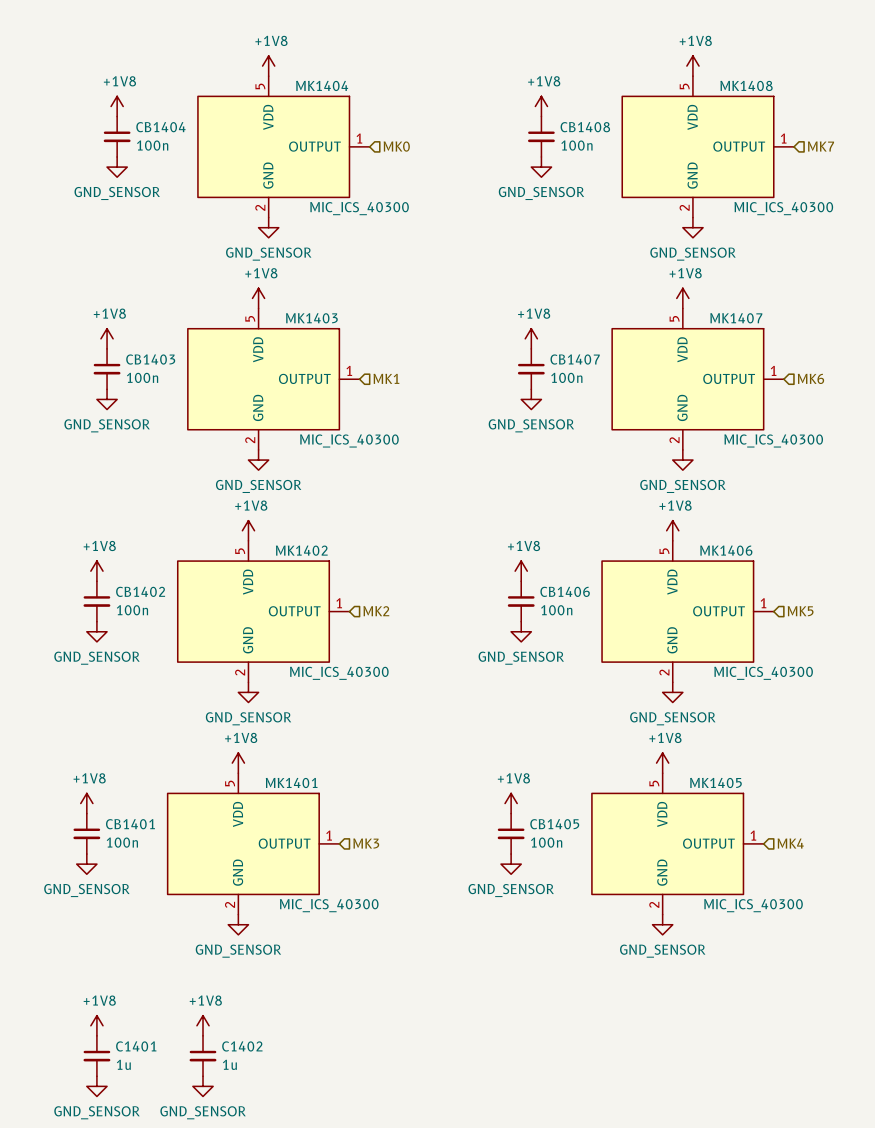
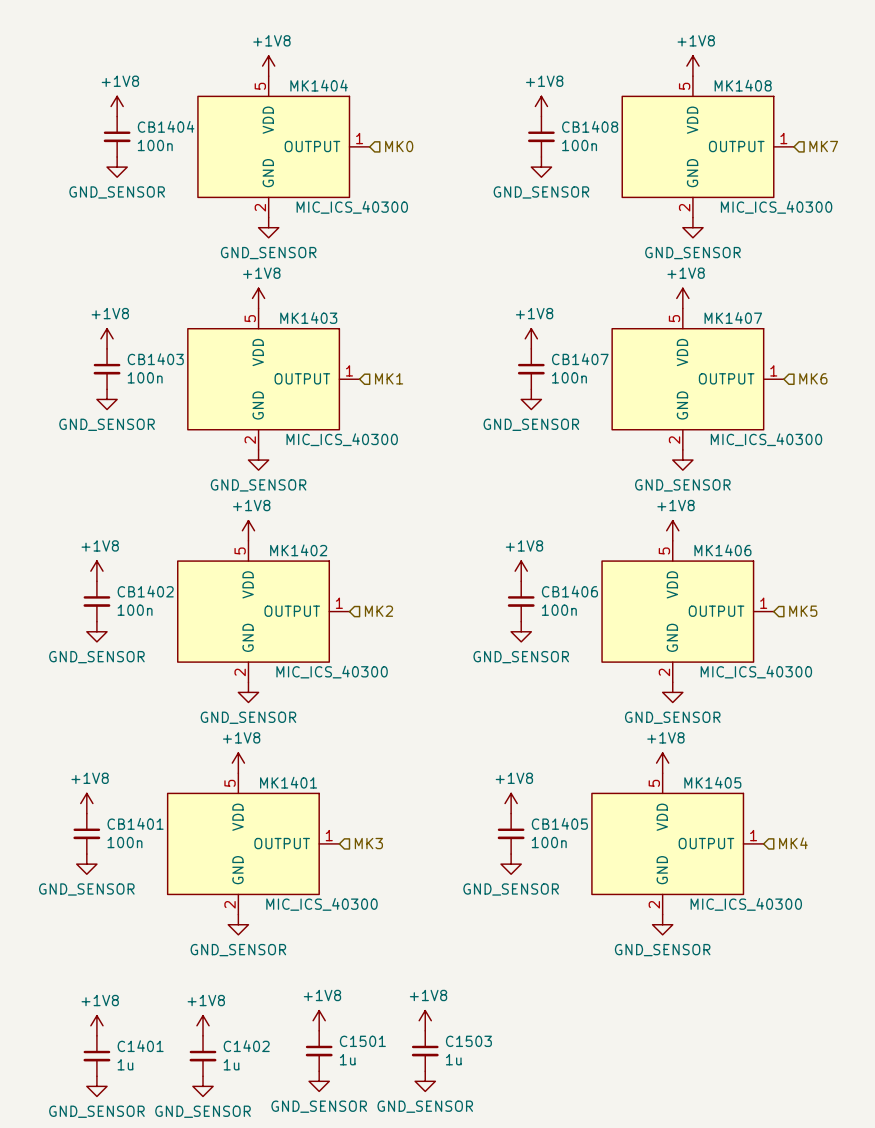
power symbol: none -> +1V8 (319, 1020)
power symbol: none -> +1V8 (425, 1020)
C1501: none -> 1u (319, 1051)
C1503: none -> 1u (425, 1051)
power symbol: none -> GND_SENSOR (319, 1081)
power symbol: none -> GND_SENSOR (425, 1081)

